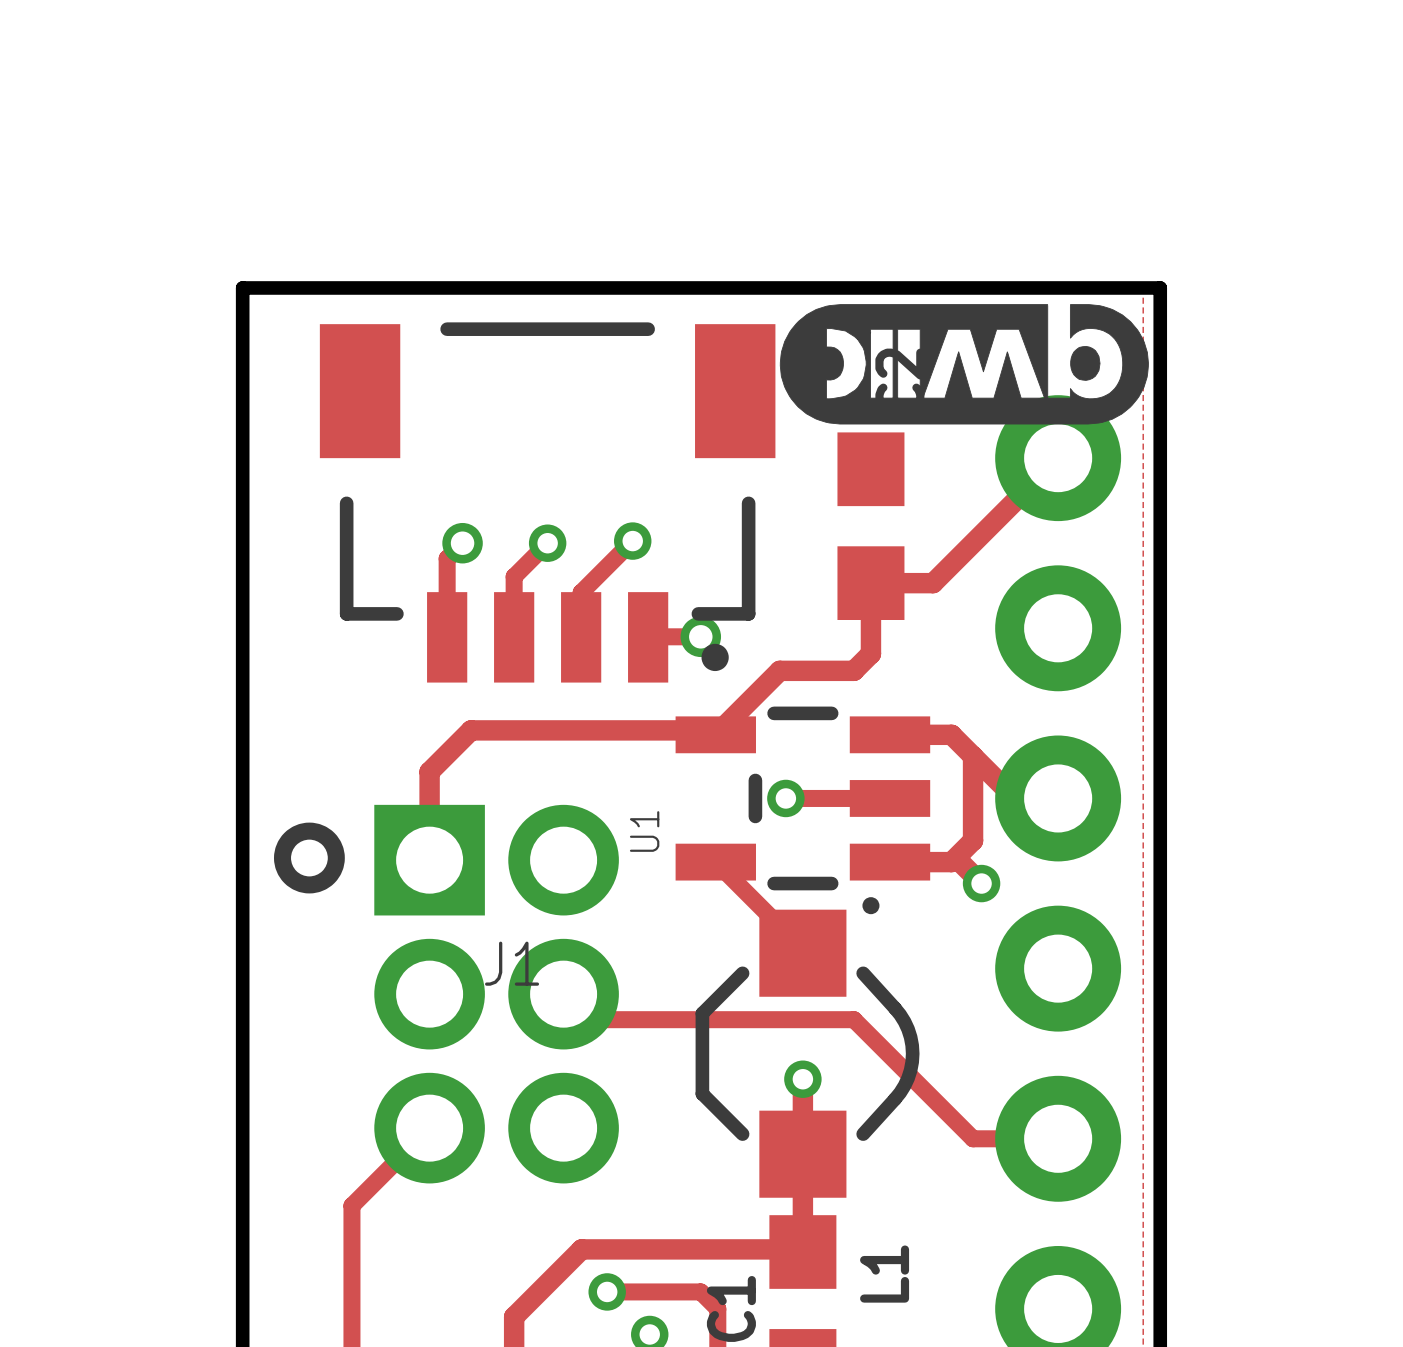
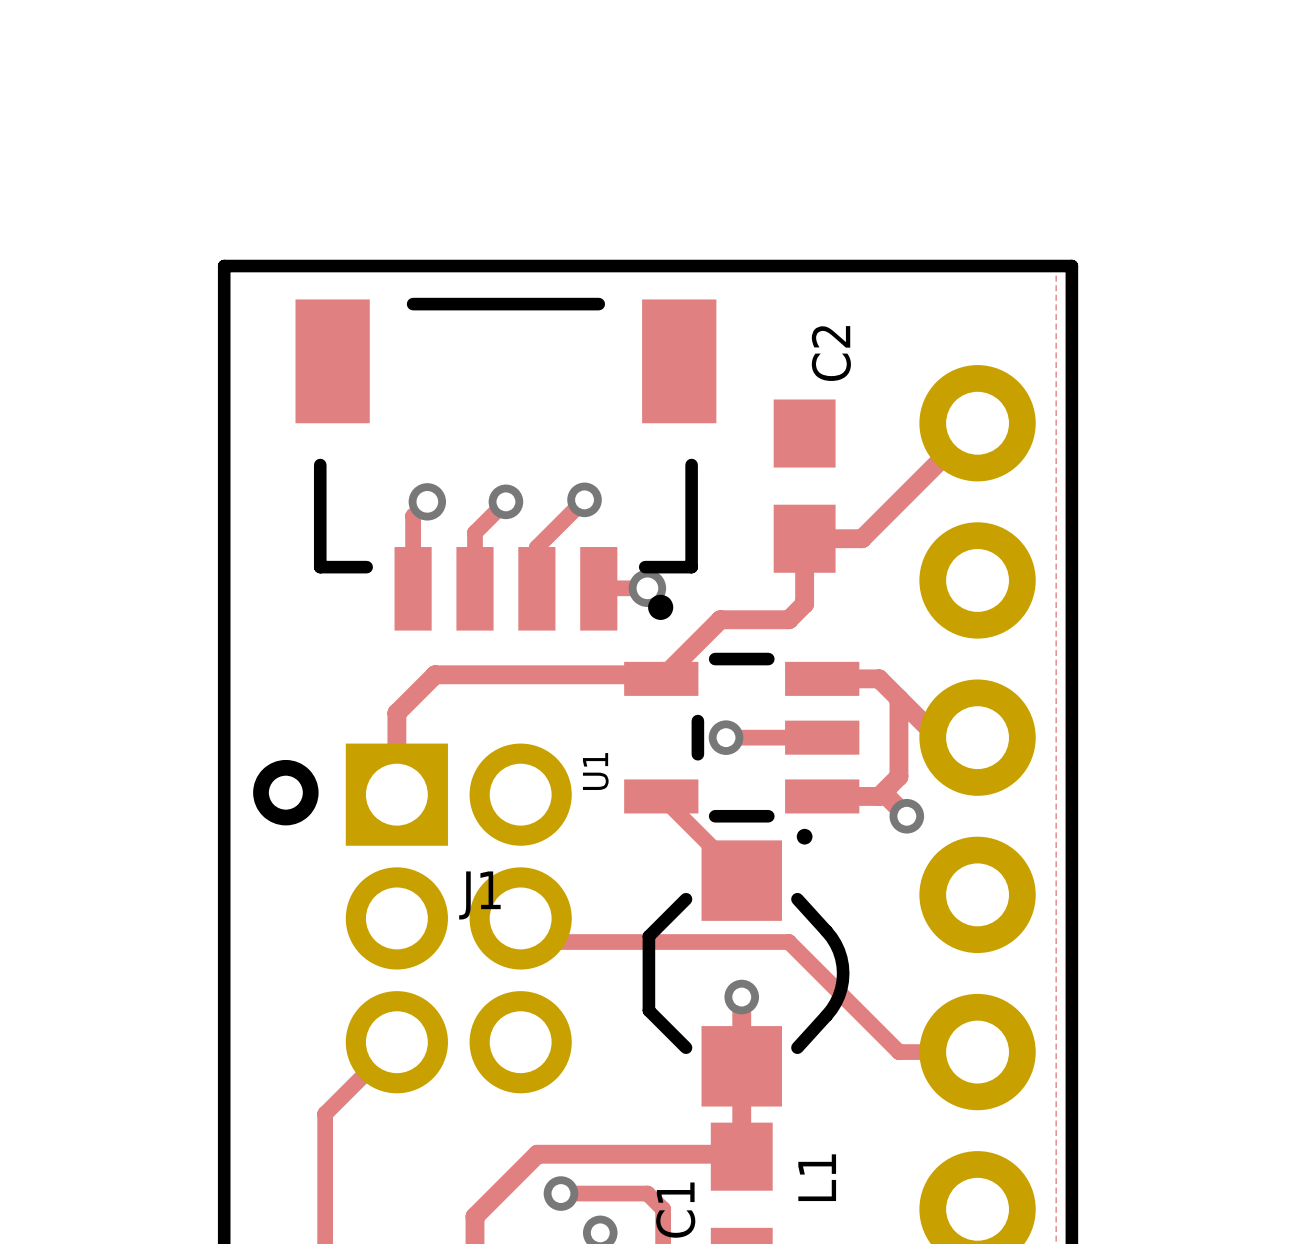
drawing: [779, 304, 1149, 425] -> none

